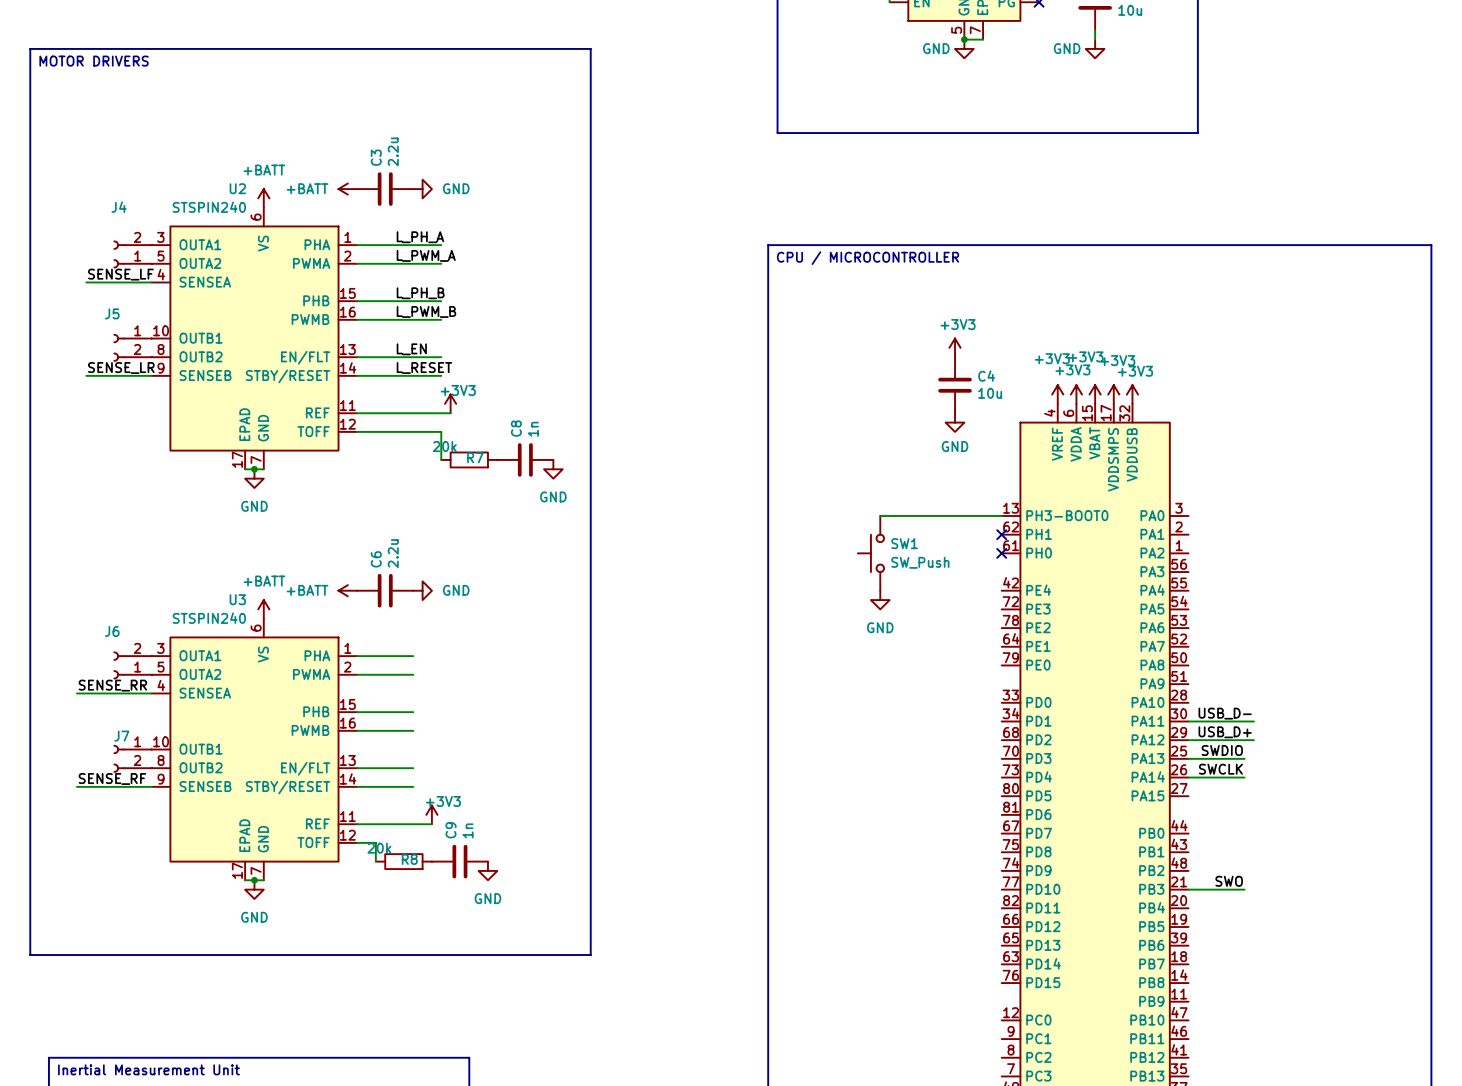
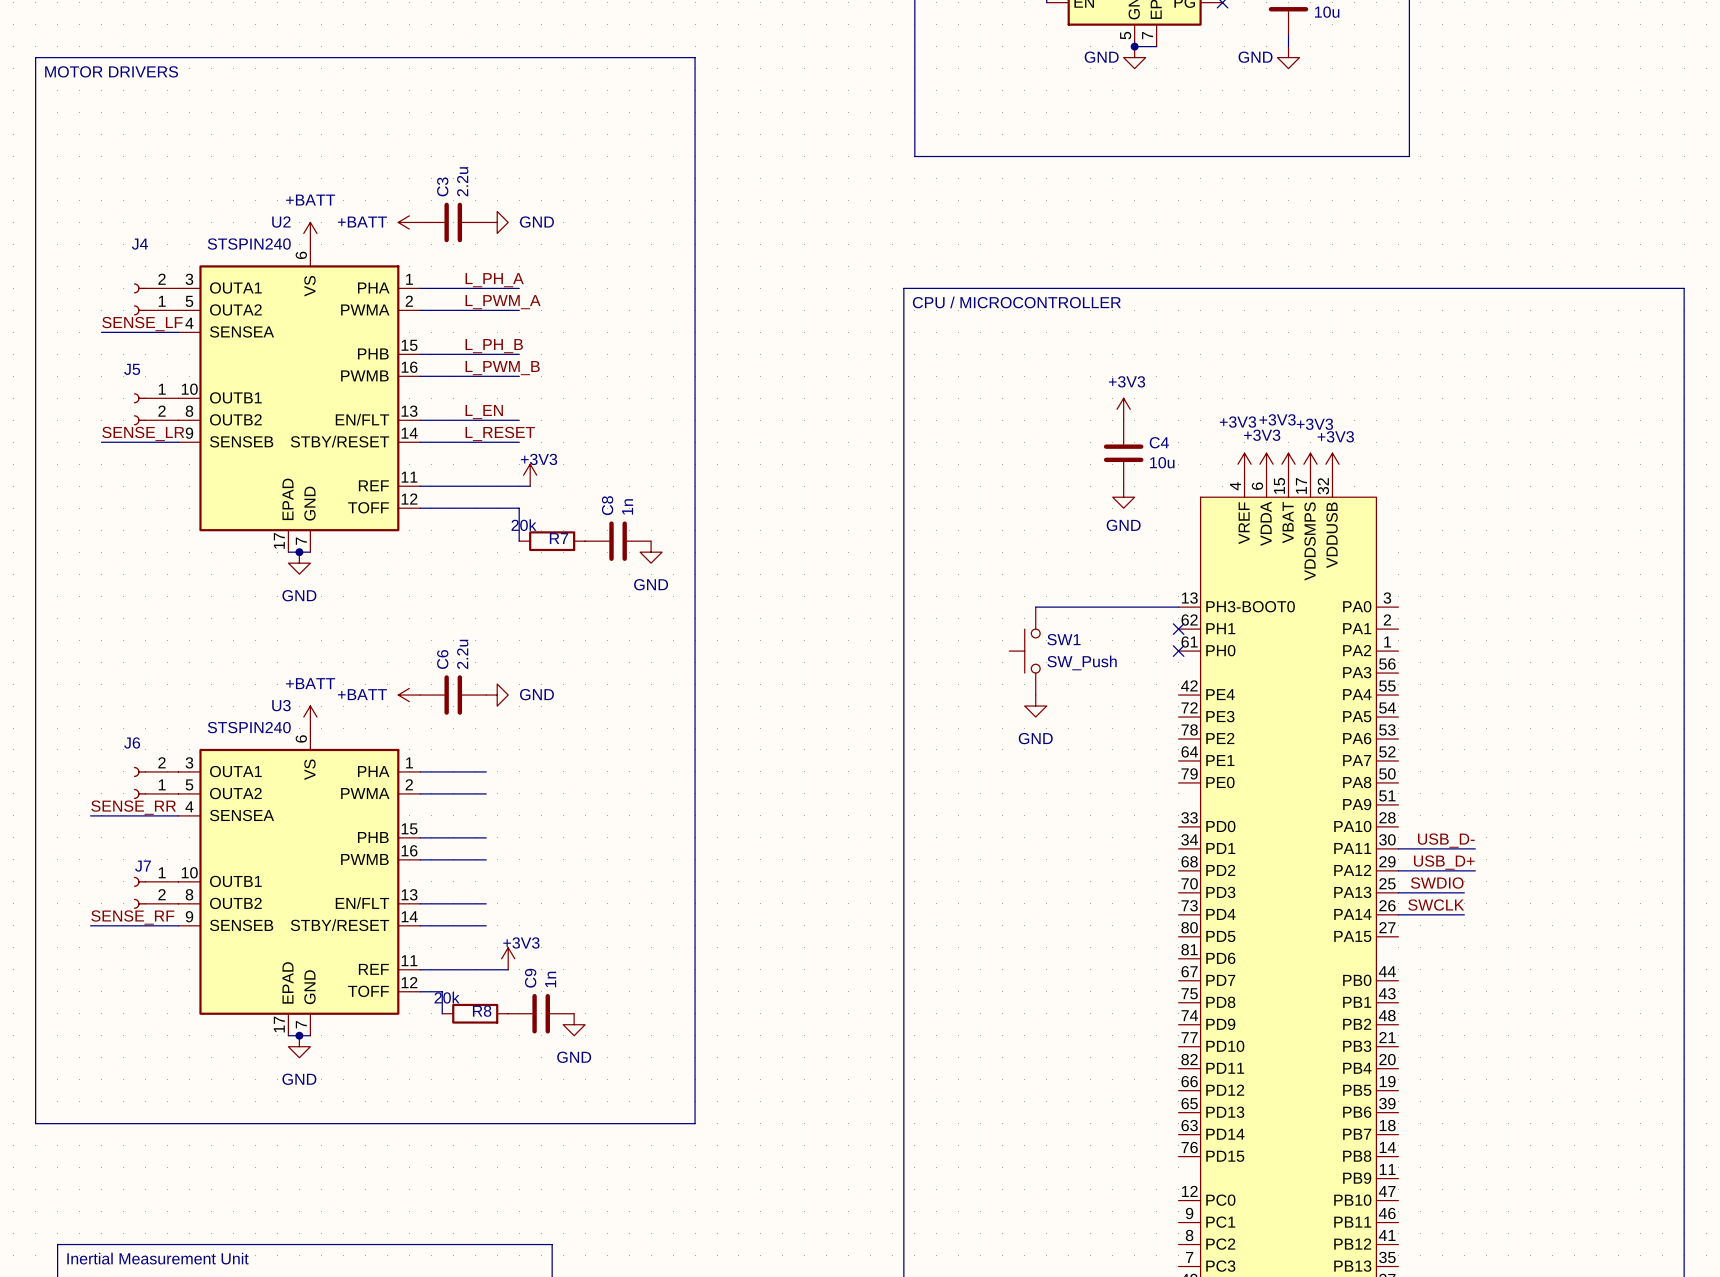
label: SWO (1229, 881) -> none
wire: (1188, 889) (1244, 889) -> none

